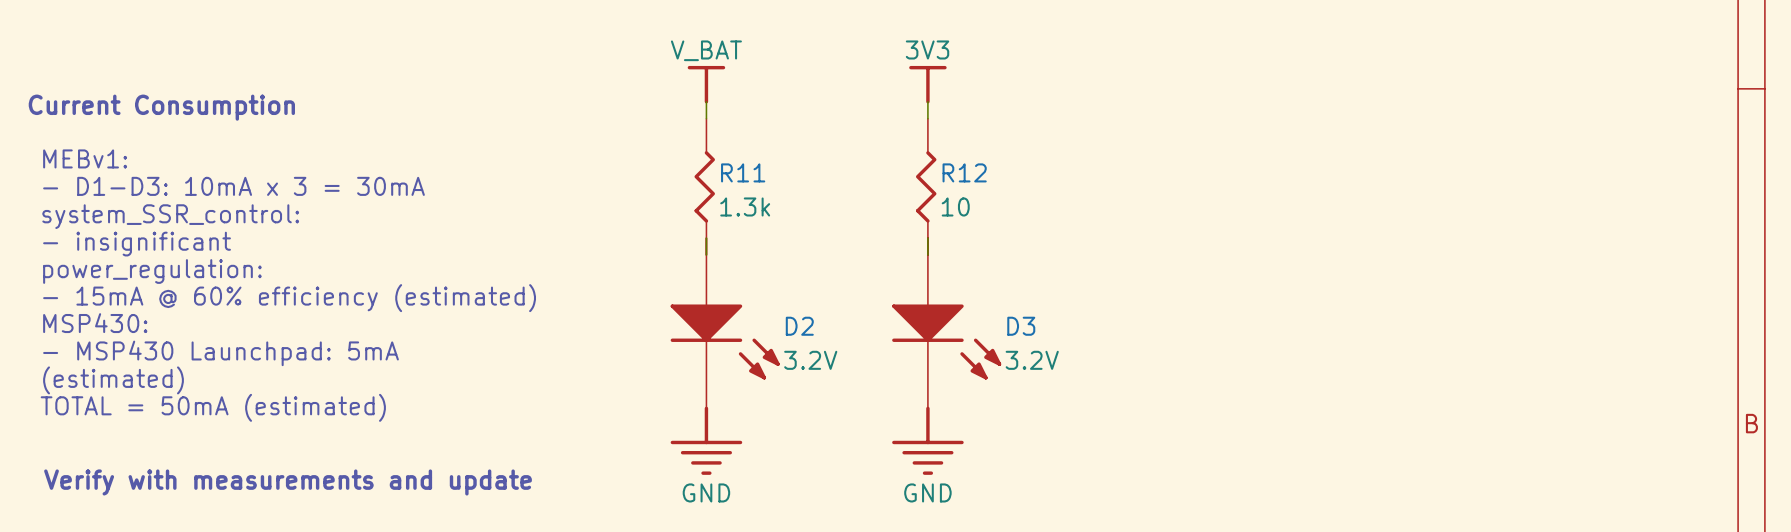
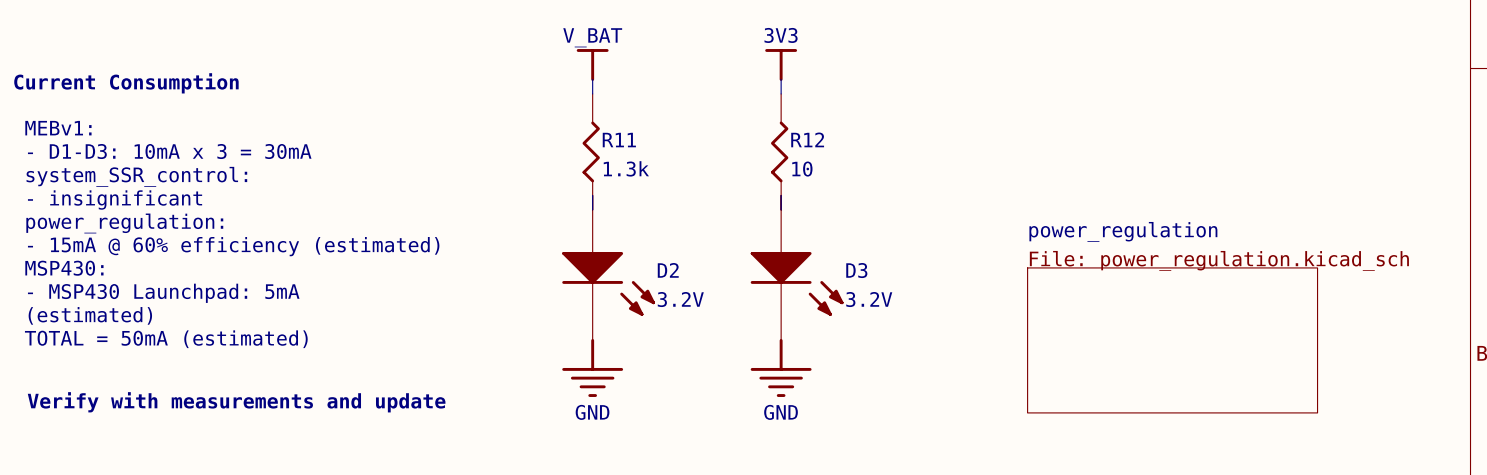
sheet power_regulation: none -> File: power_regulation.kicad_sch (1172, 340)

